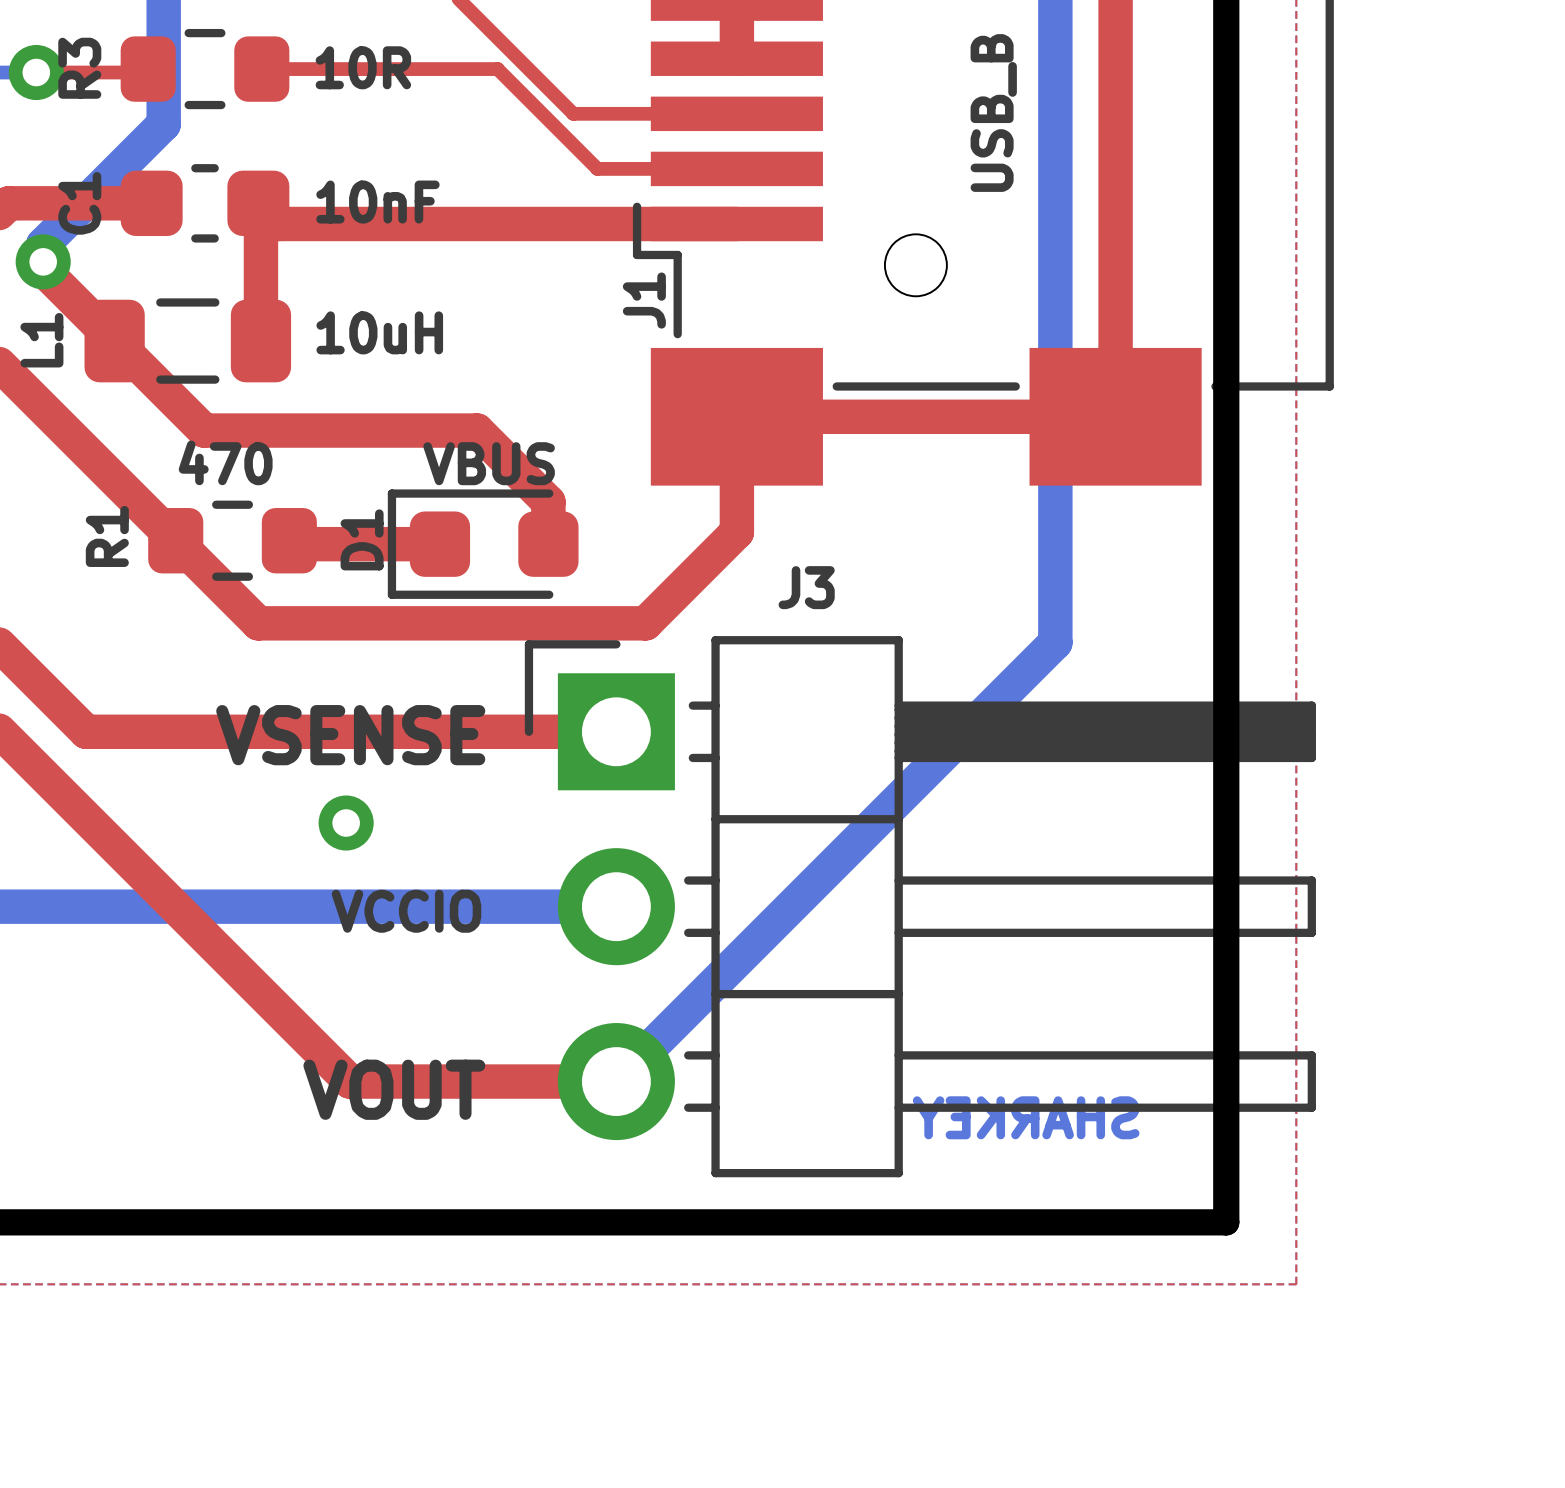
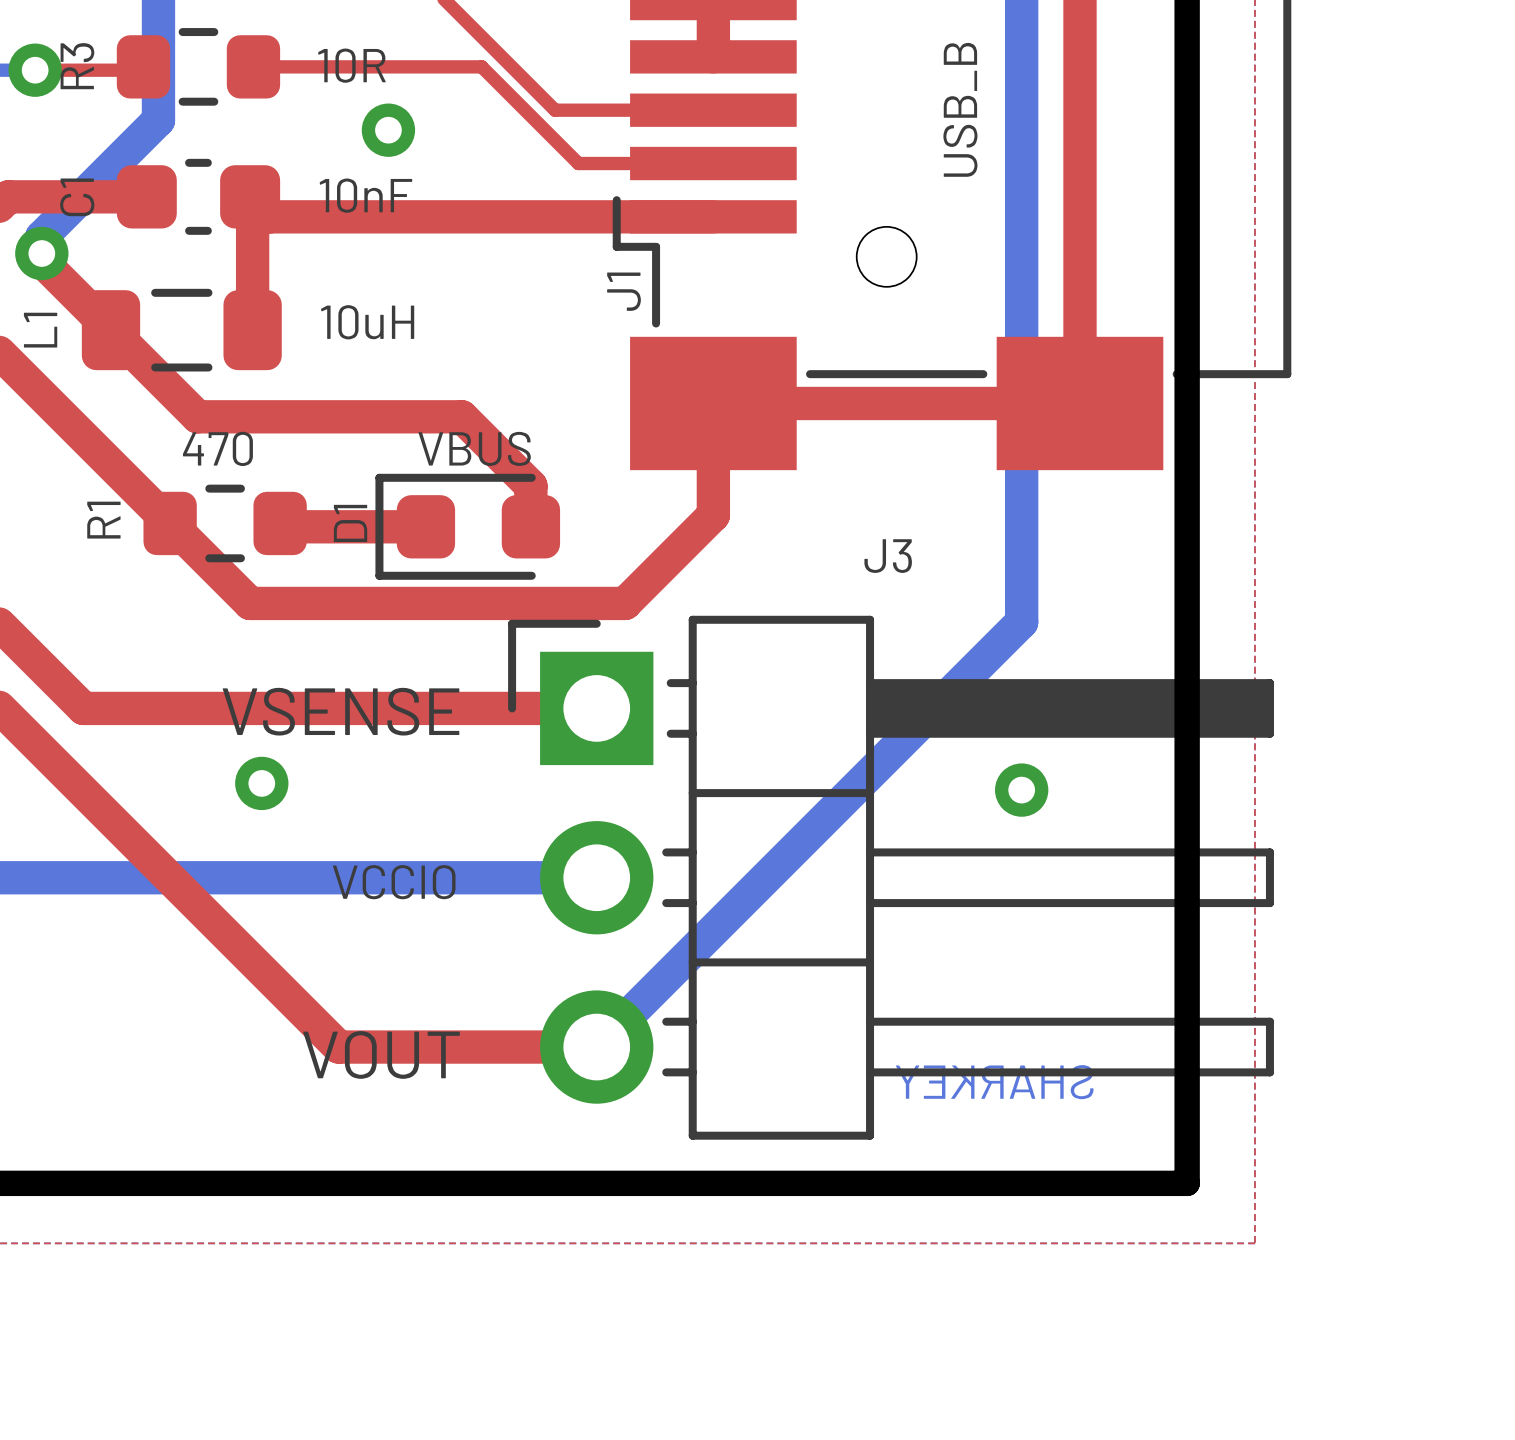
via: none -> (388, 130)
J3 name position: J3 (806, 587) -> J3 (888, 556)
via: none -> (1021, 790)
via position: (346, 823) -> (261, 783)

